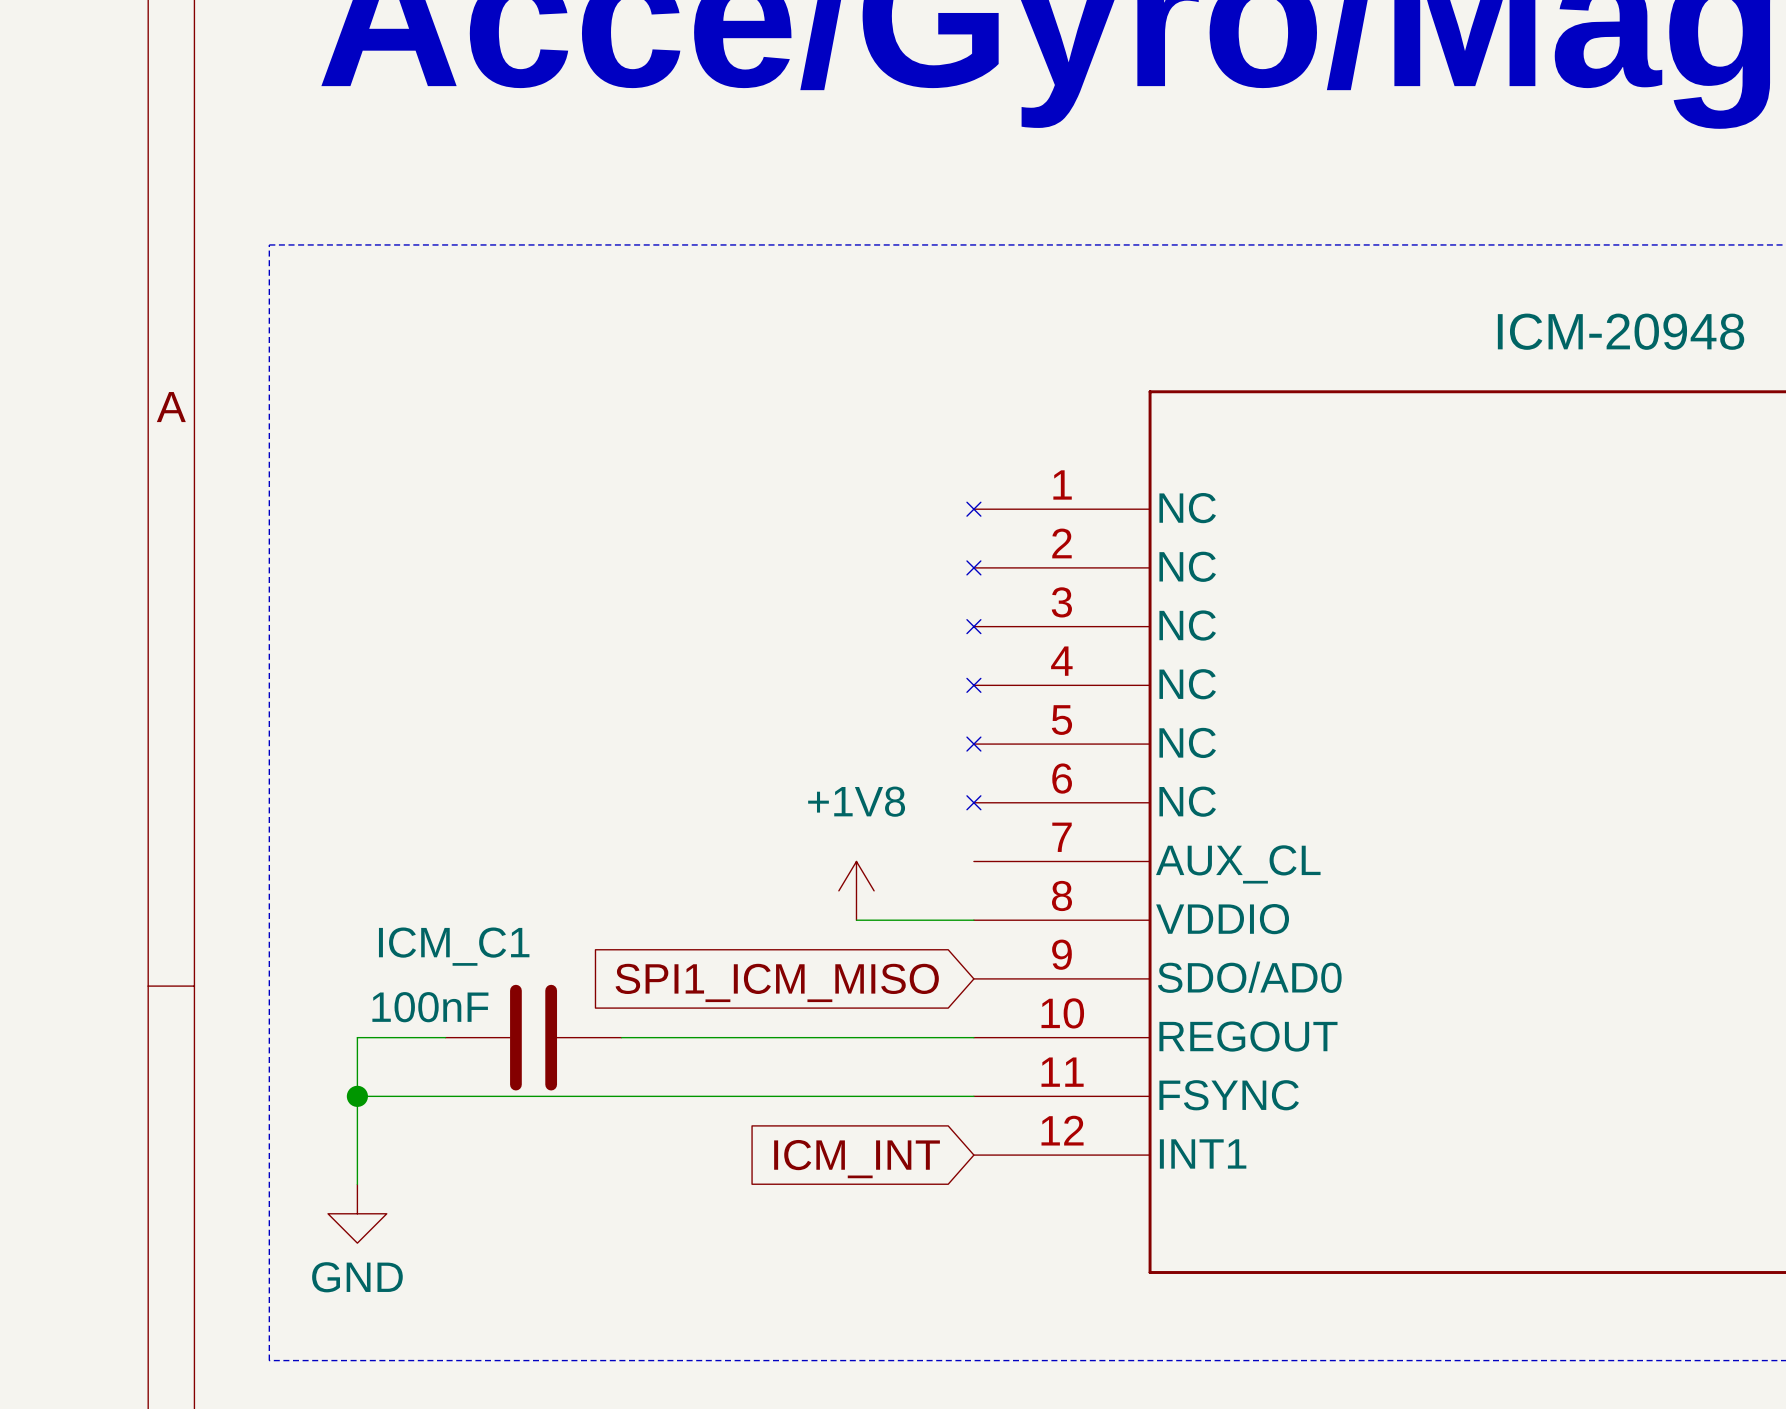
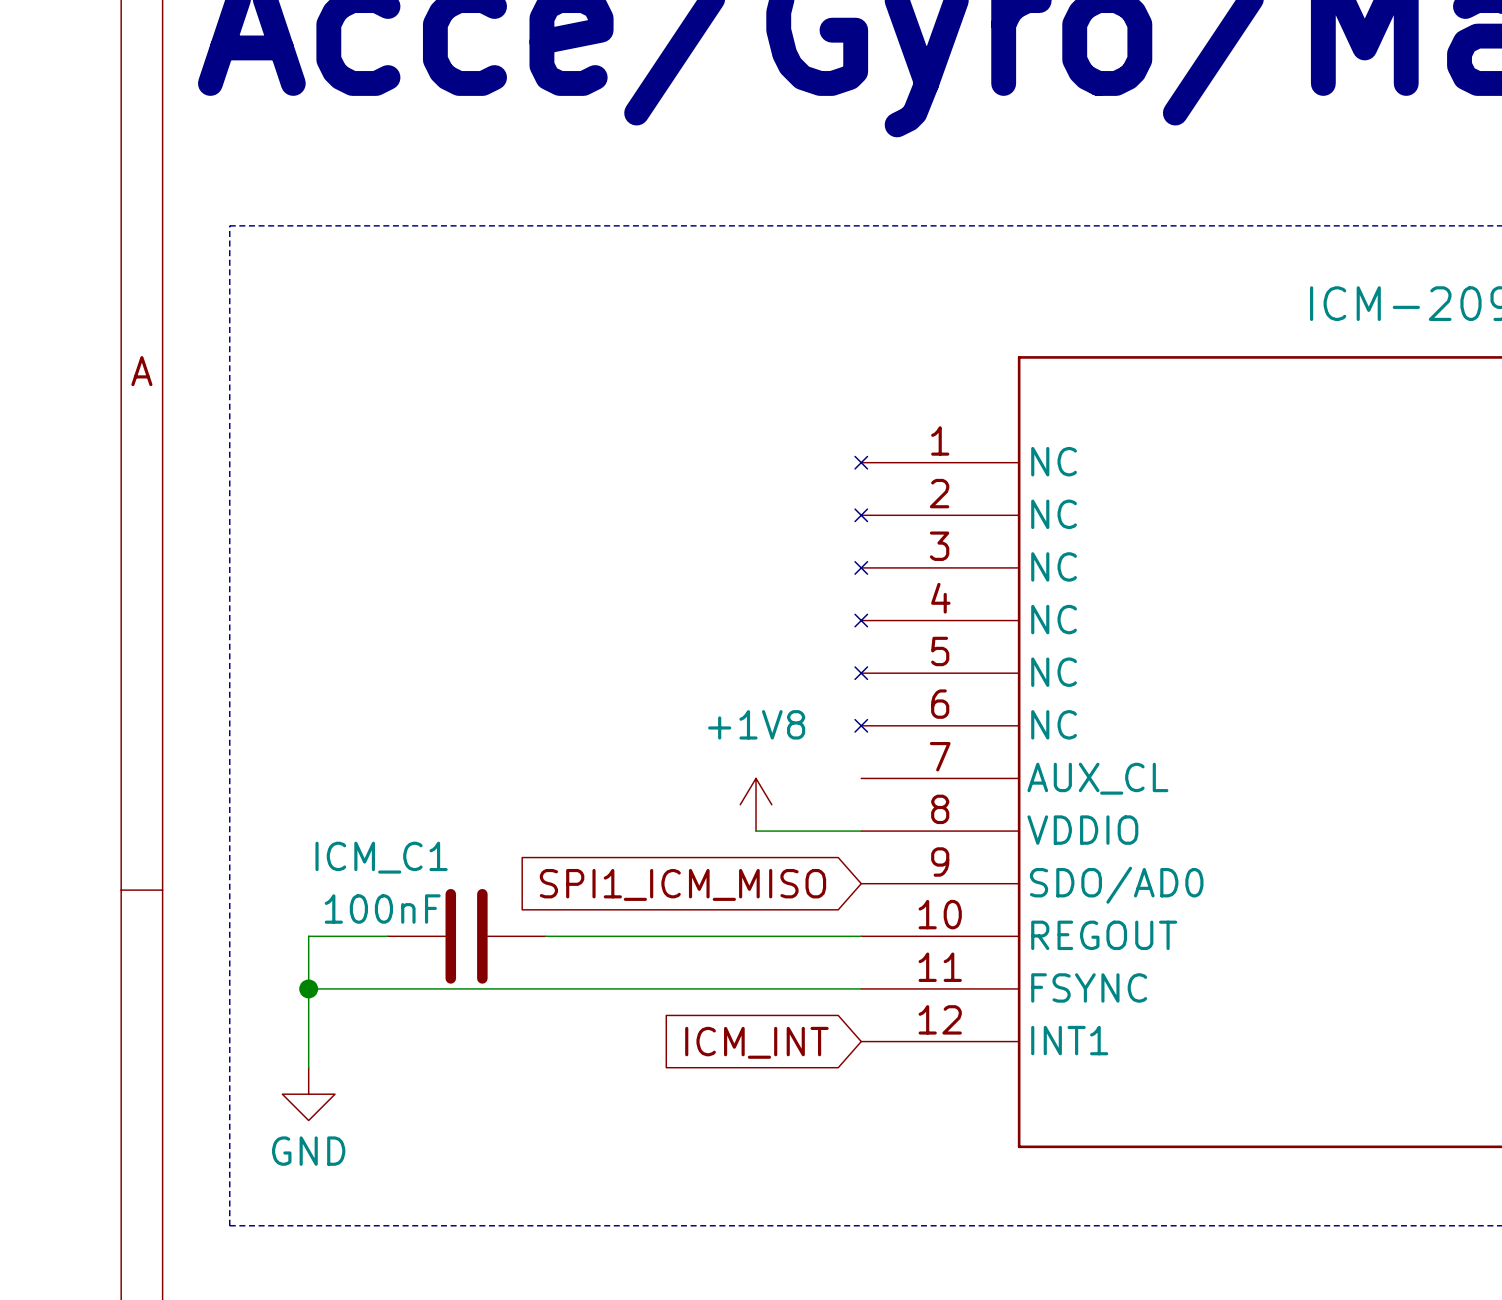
ICM_C1 name position: ICM_C1 (454, 946) -> ICM_C1 (381, 857)

